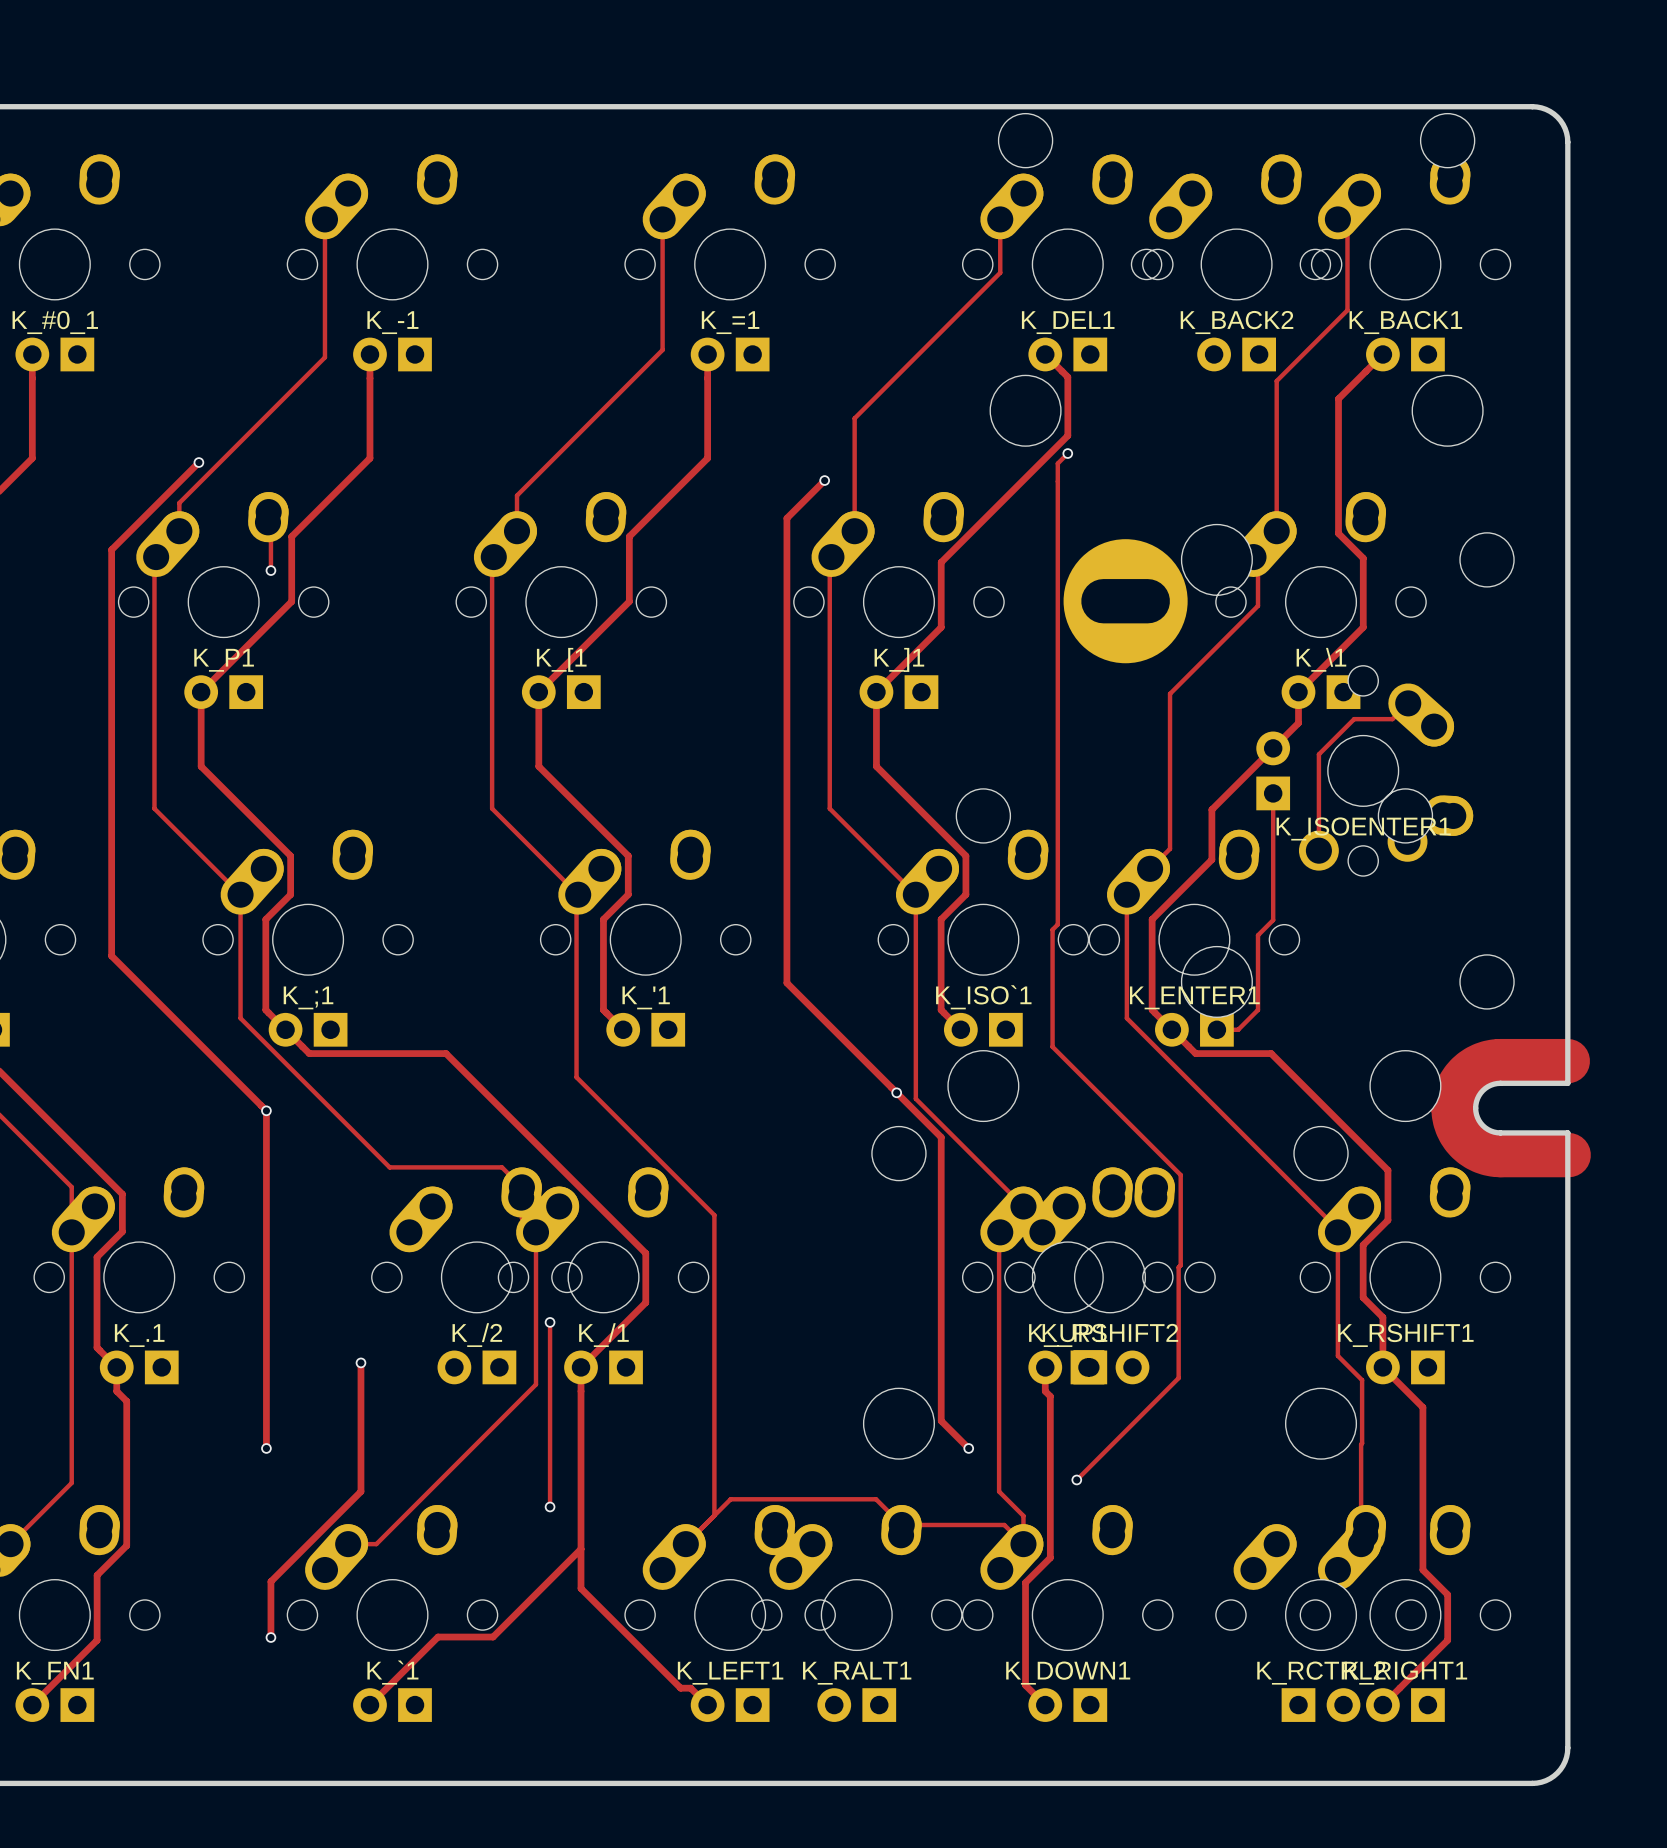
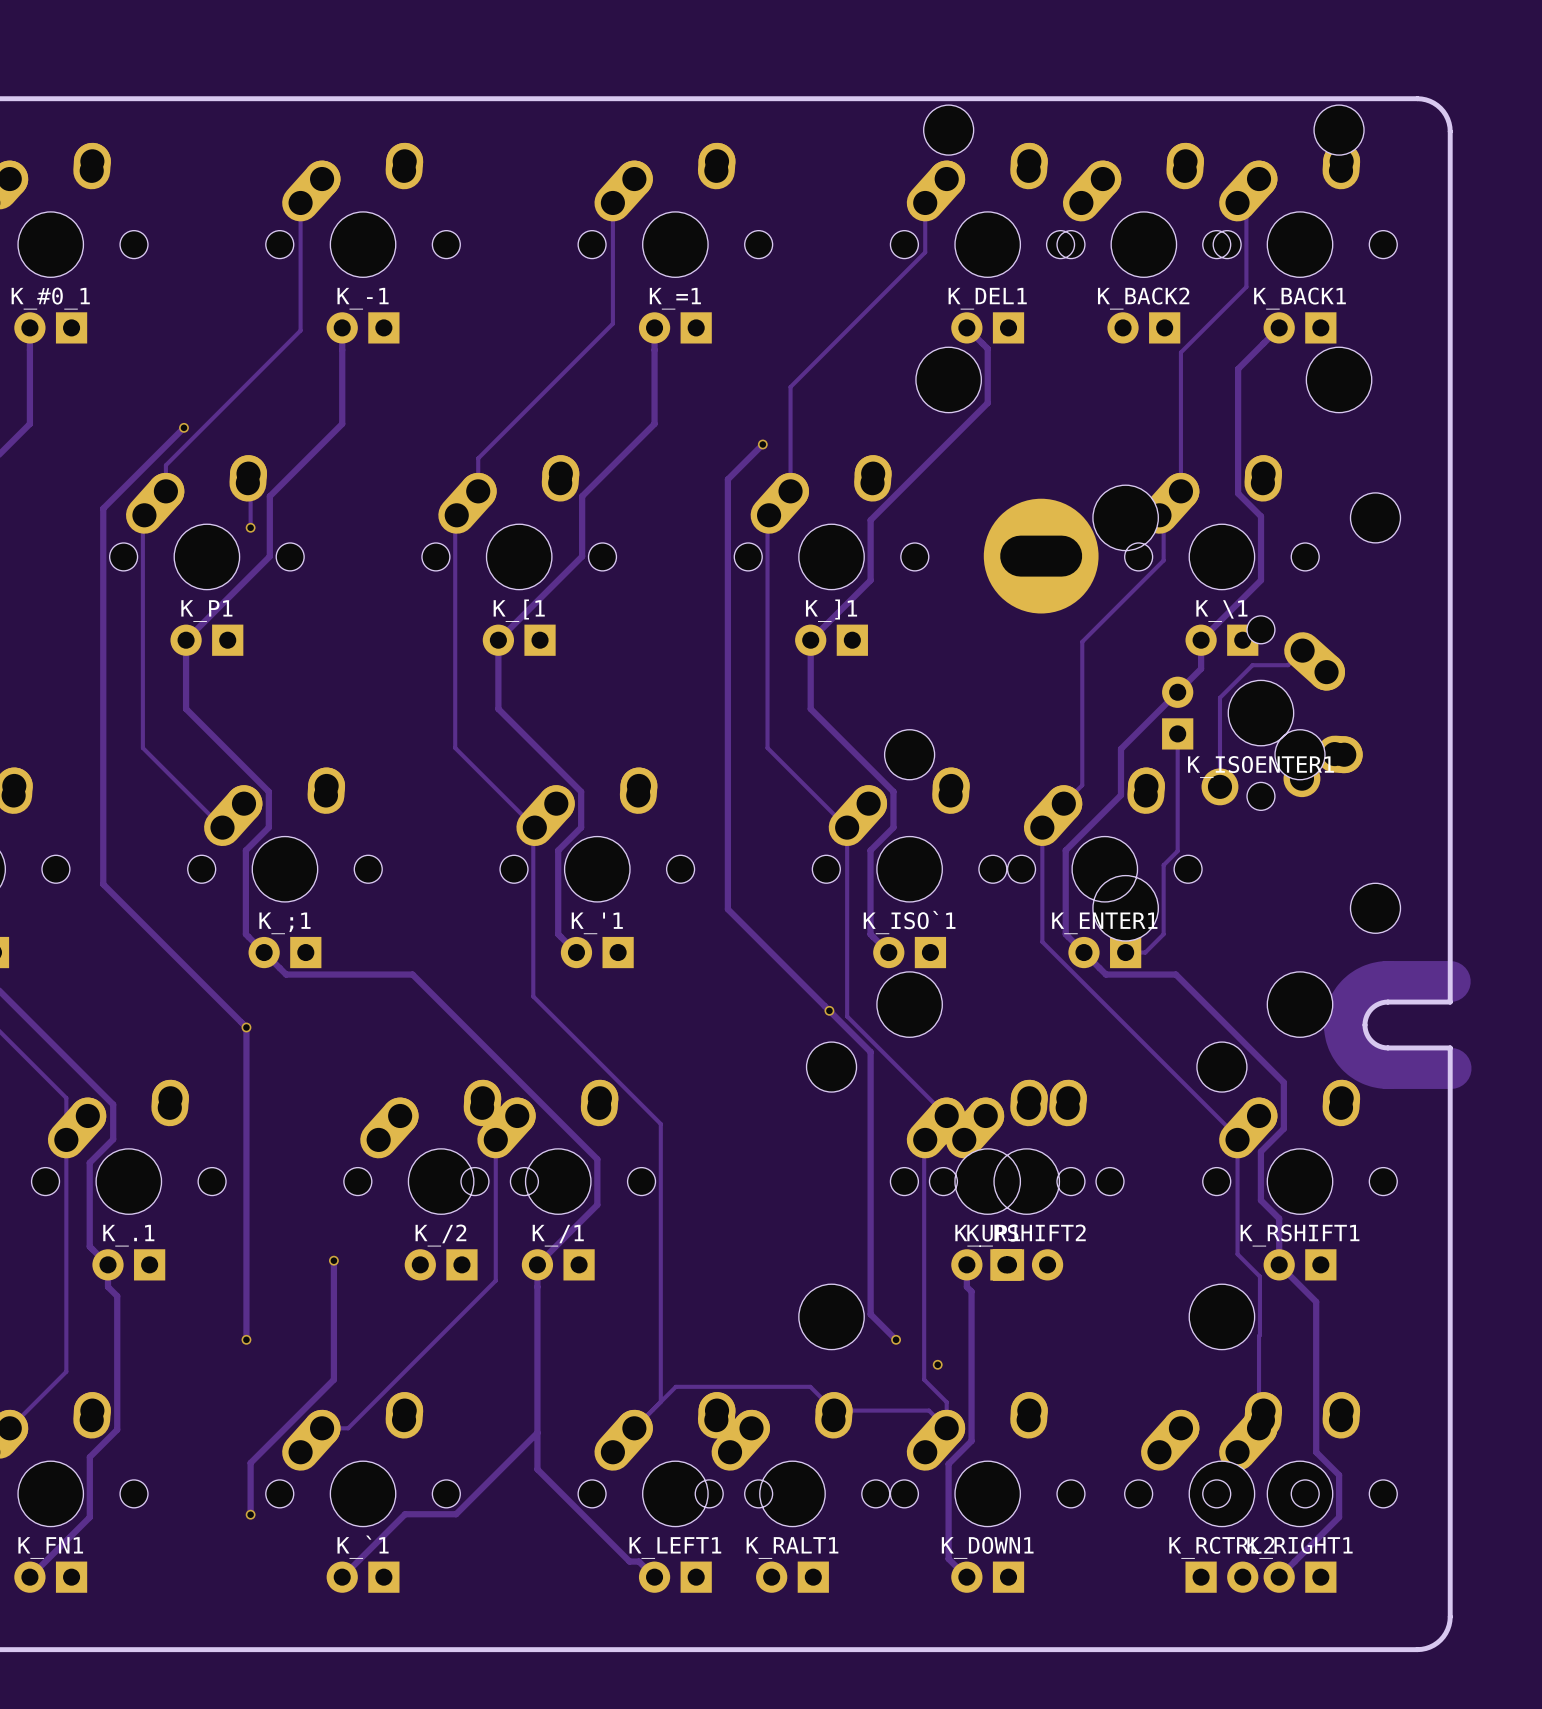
track: (1067, 453) (1057, 463) (1057, 924) (1052, 929) (1052, 1046) (1180, 1175) (1178, 1378) (1076, 1479) -> none
via: (1067, 453) -> none
track: (240, 894) (240, 1018) (389, 1167) (501, 1167) (521, 1187) (521, 1218) (535, 1232) -> none
track: (550, 1322) (550, 1506) -> none
via: (550, 1322) -> none
via position: (1076, 1479) -> (937, 1364)
via: (550, 1506) -> none

